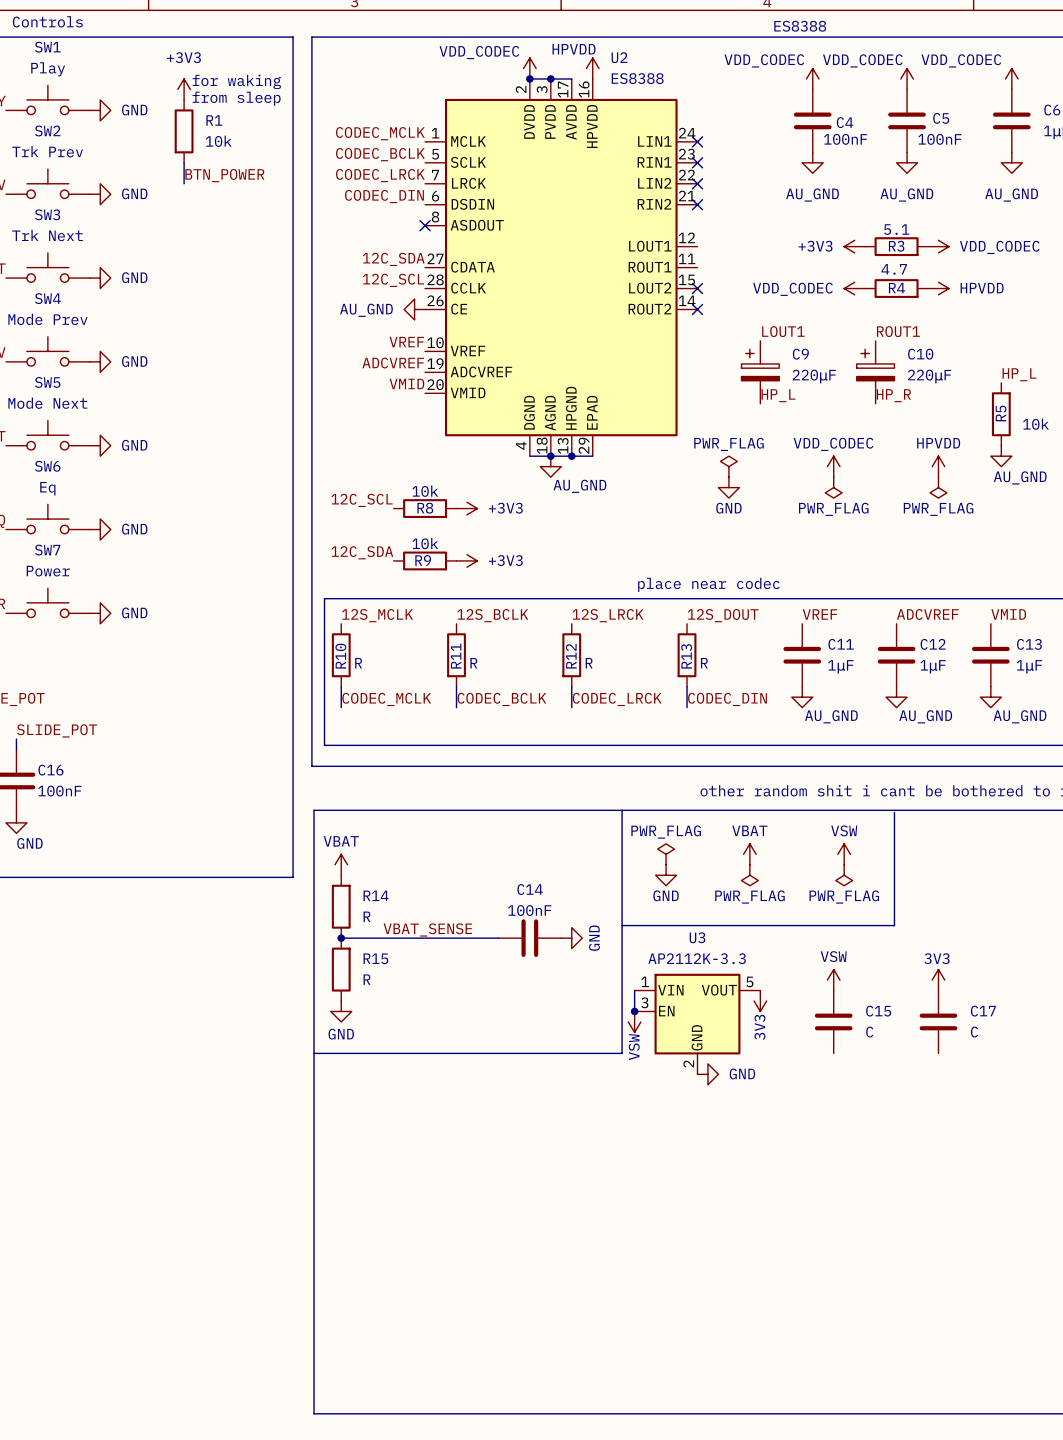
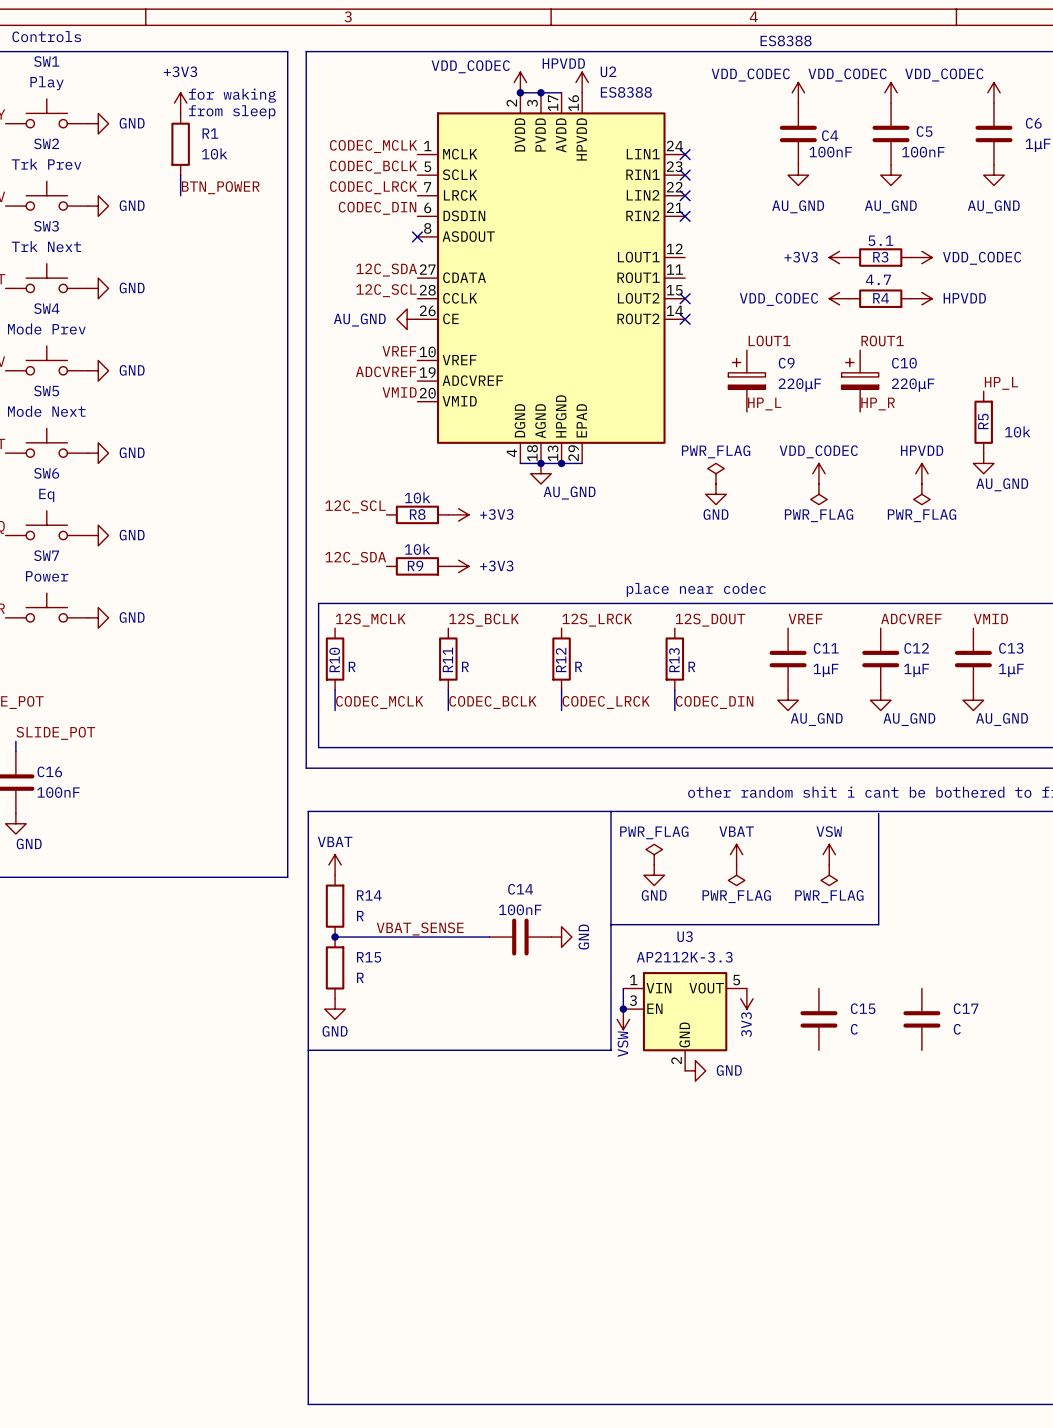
power symbol: VSW (833, 980) -> none
power symbol: 3V3 (938, 980) -> none

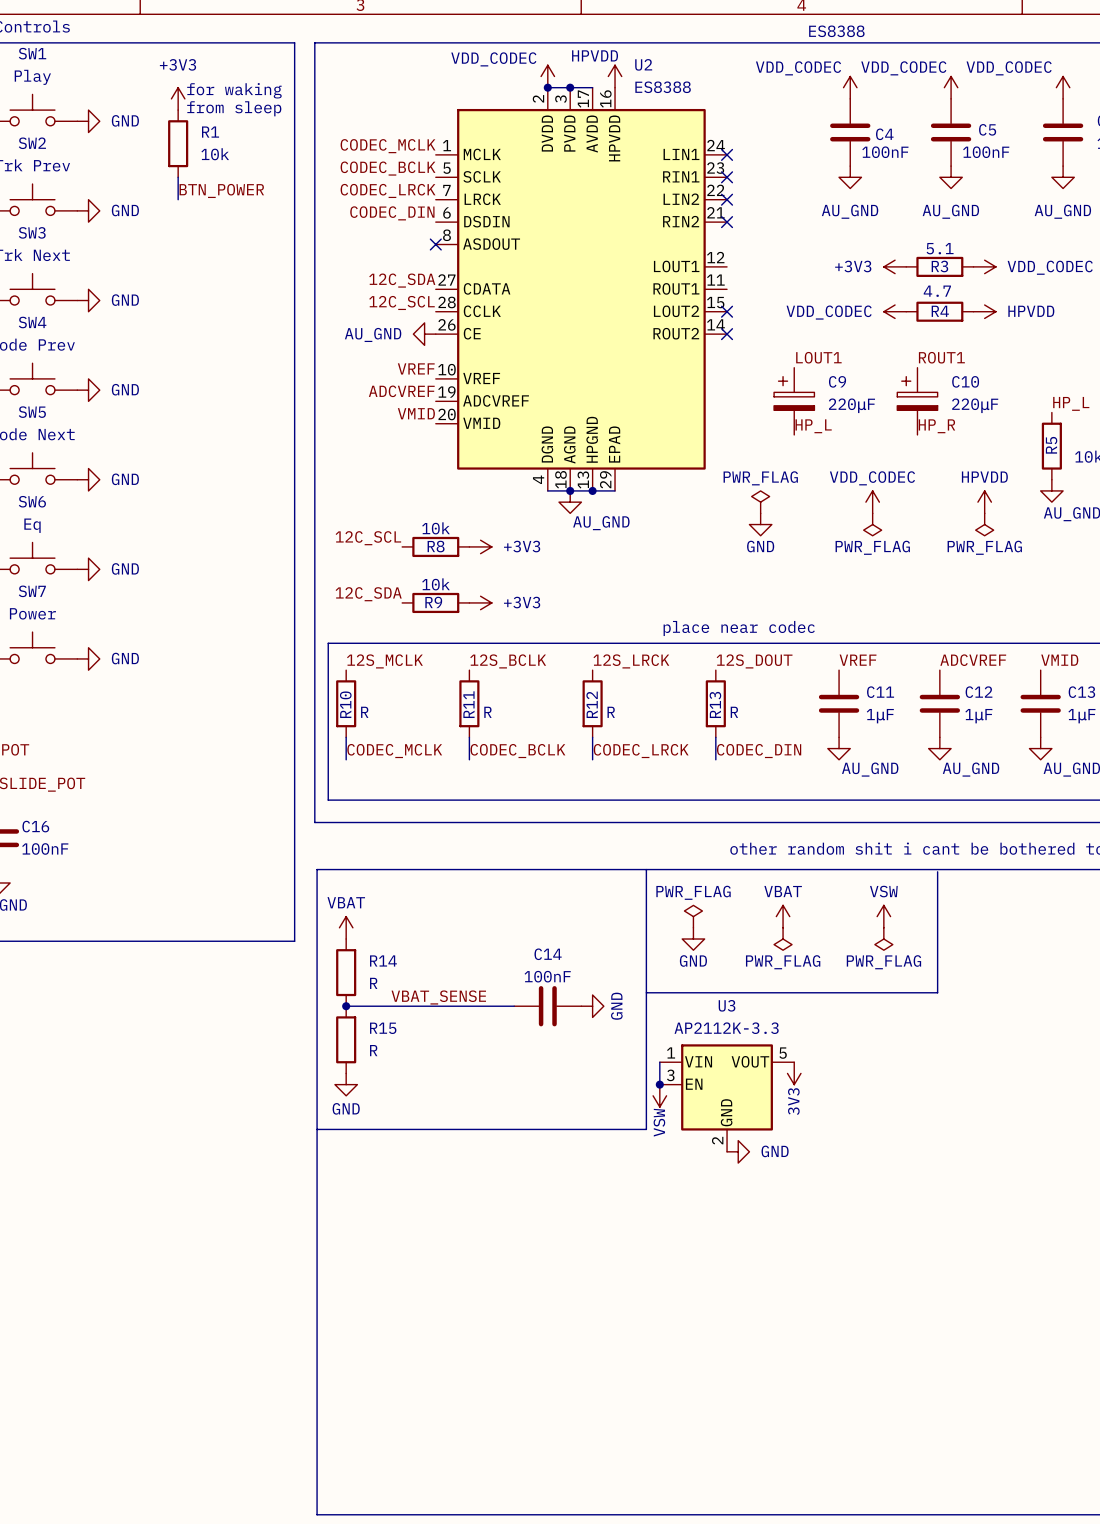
C15: C (818, 1019) -> none
C17: C (921, 1019) -> none

